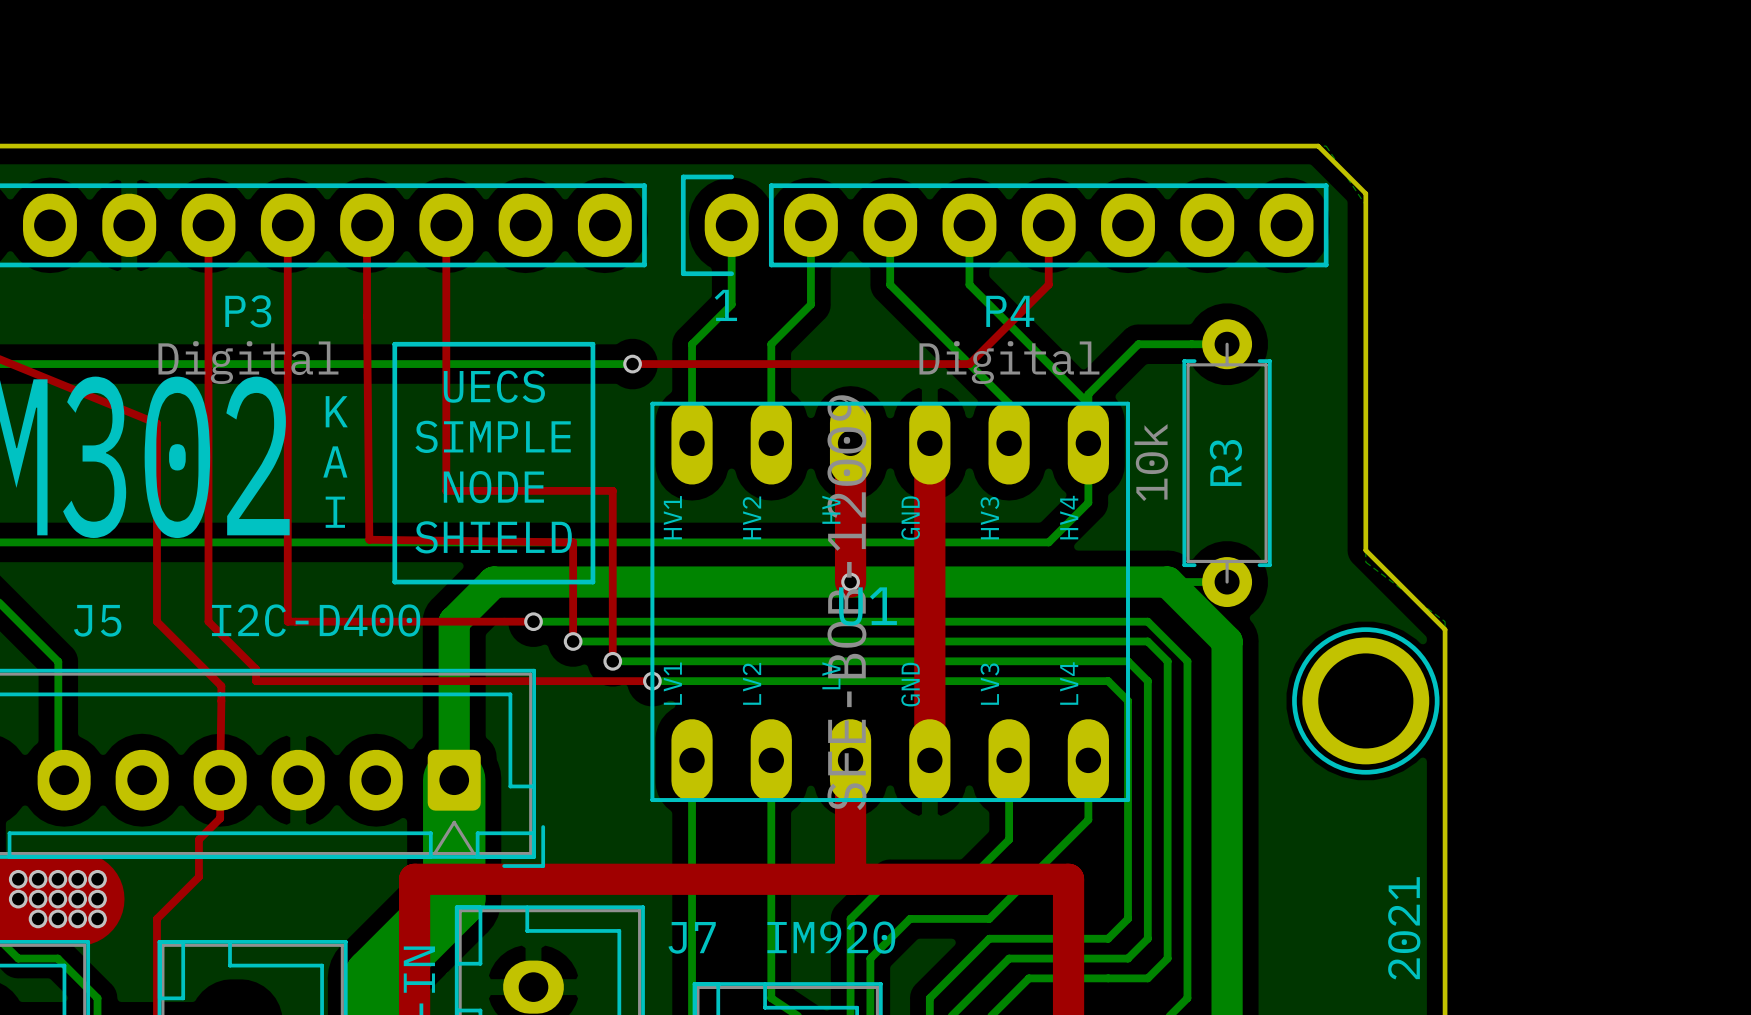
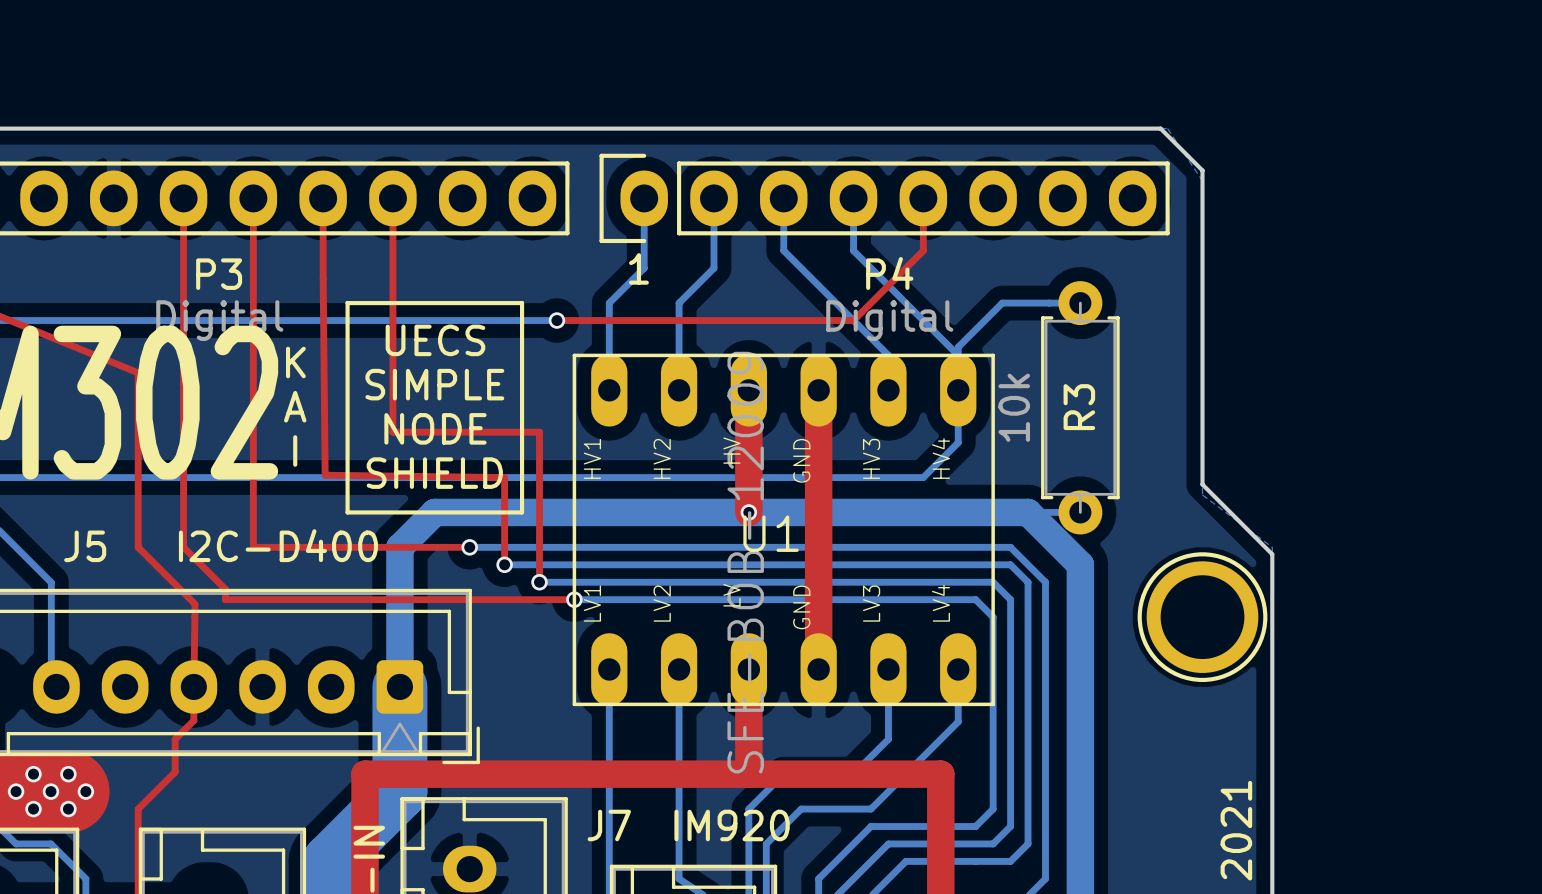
via: (18, 879) -> none
via: (57, 879) -> none
via: (97, 879) -> none
via: (38, 899) -> none
via: (77, 899) -> none
via: (57, 918) -> none
via: (97, 918) -> none

